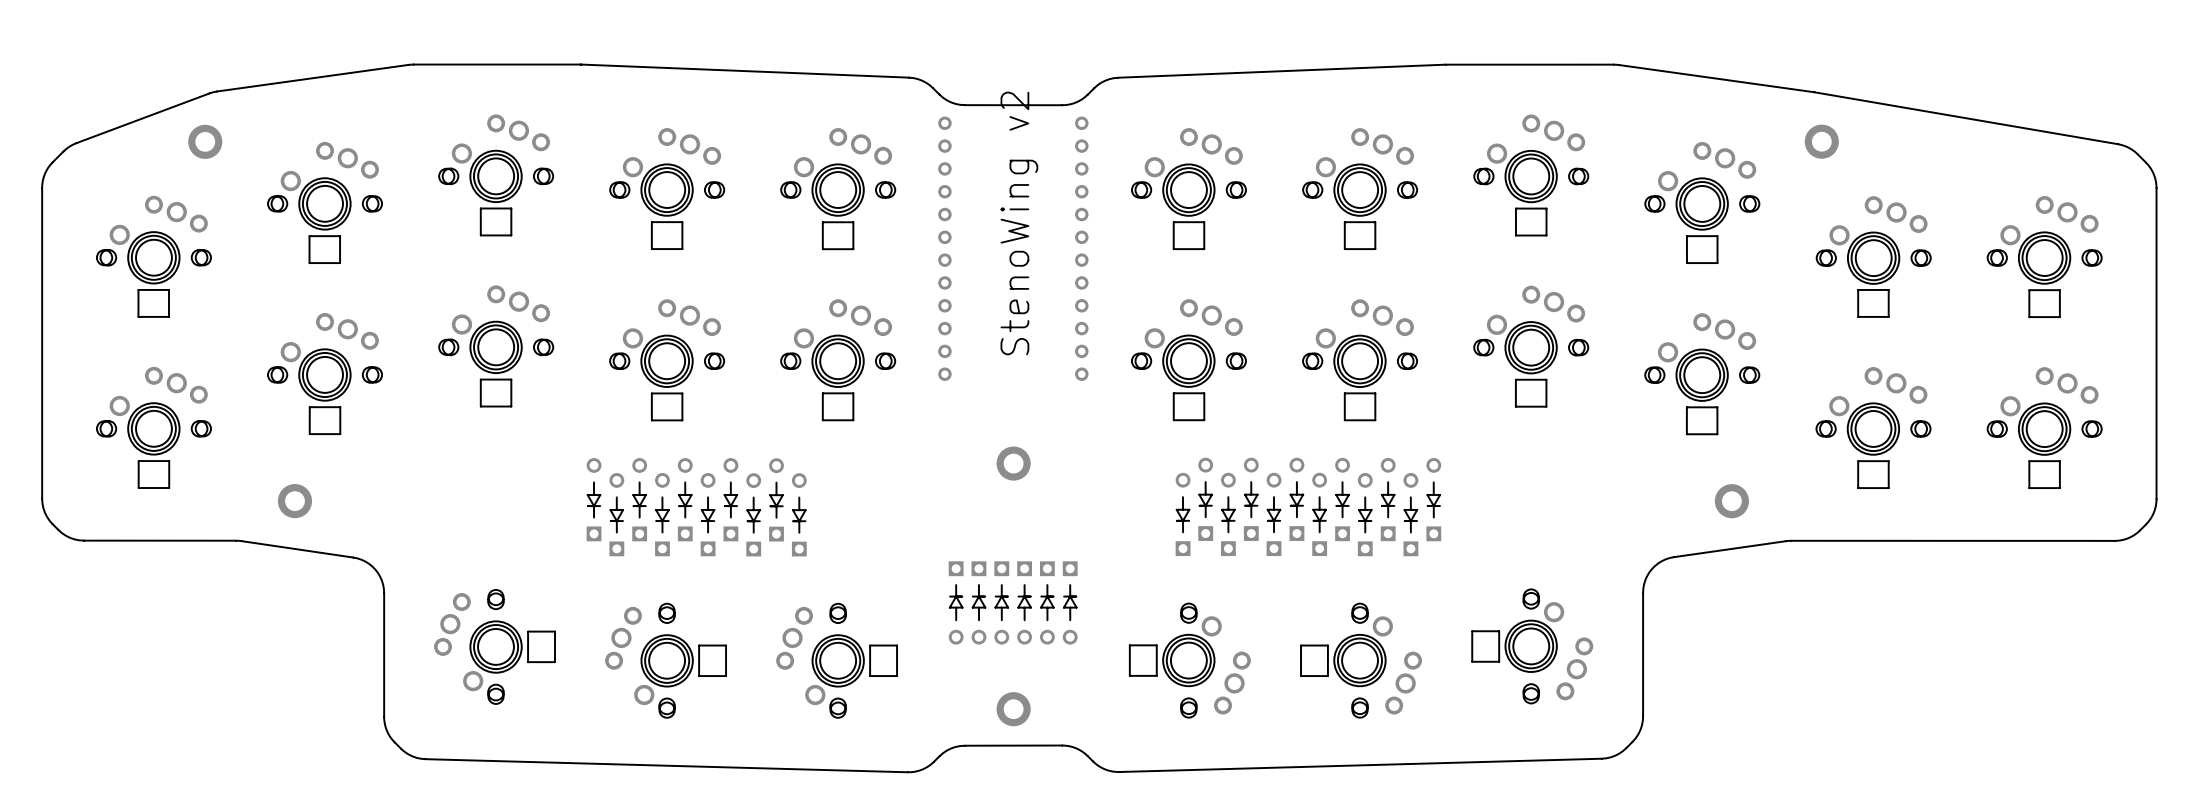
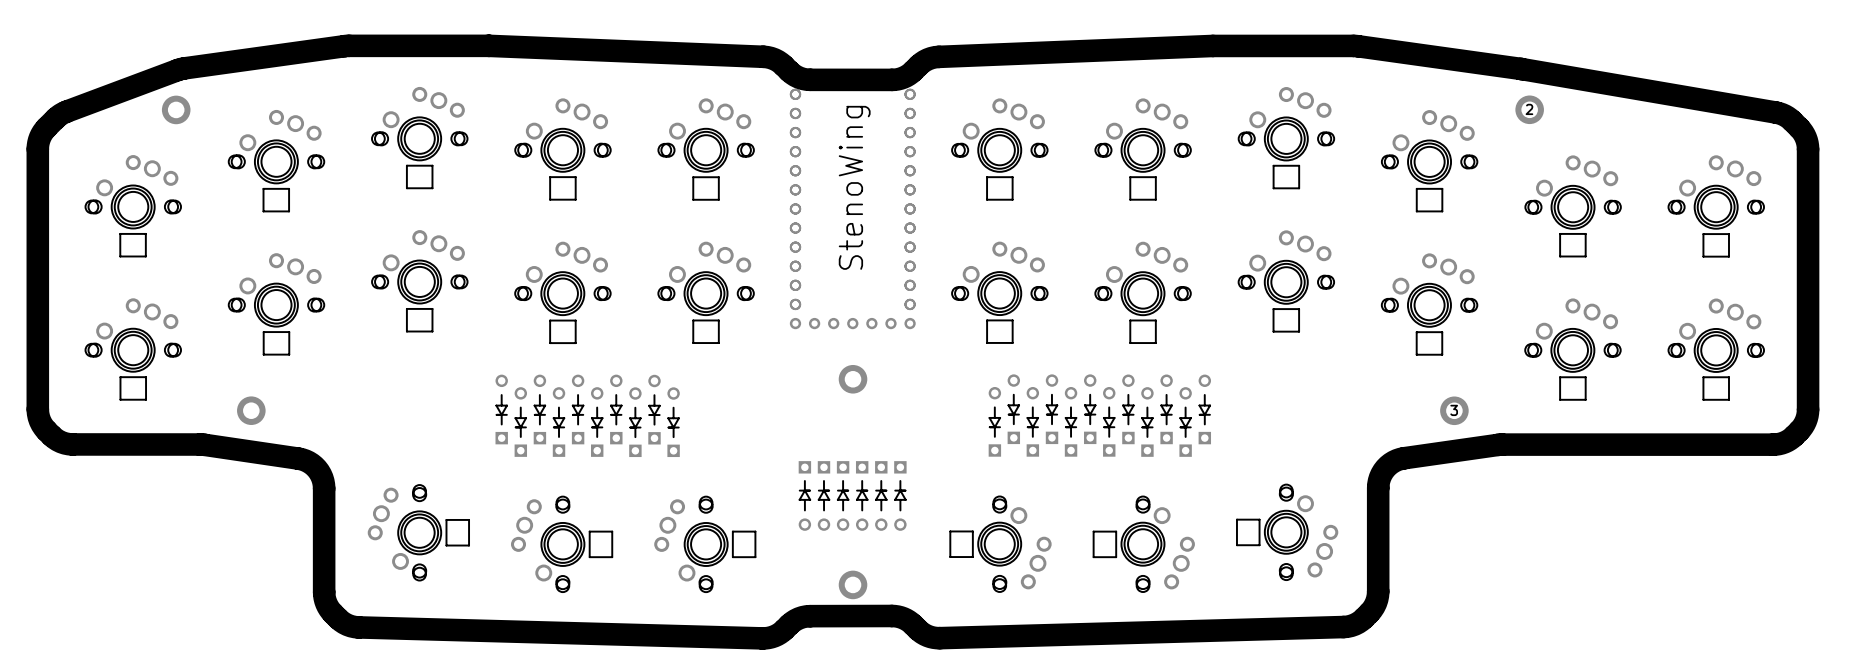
drawing: none -> [26, 34, 1820, 650]
2 name: none -> 2 (1529, 109)
text: StenoWing v2 (1019, 223) -> StenoWing (854, 187)
part: none -> (852, 208)
3 name: none -> 3 (1454, 410)

